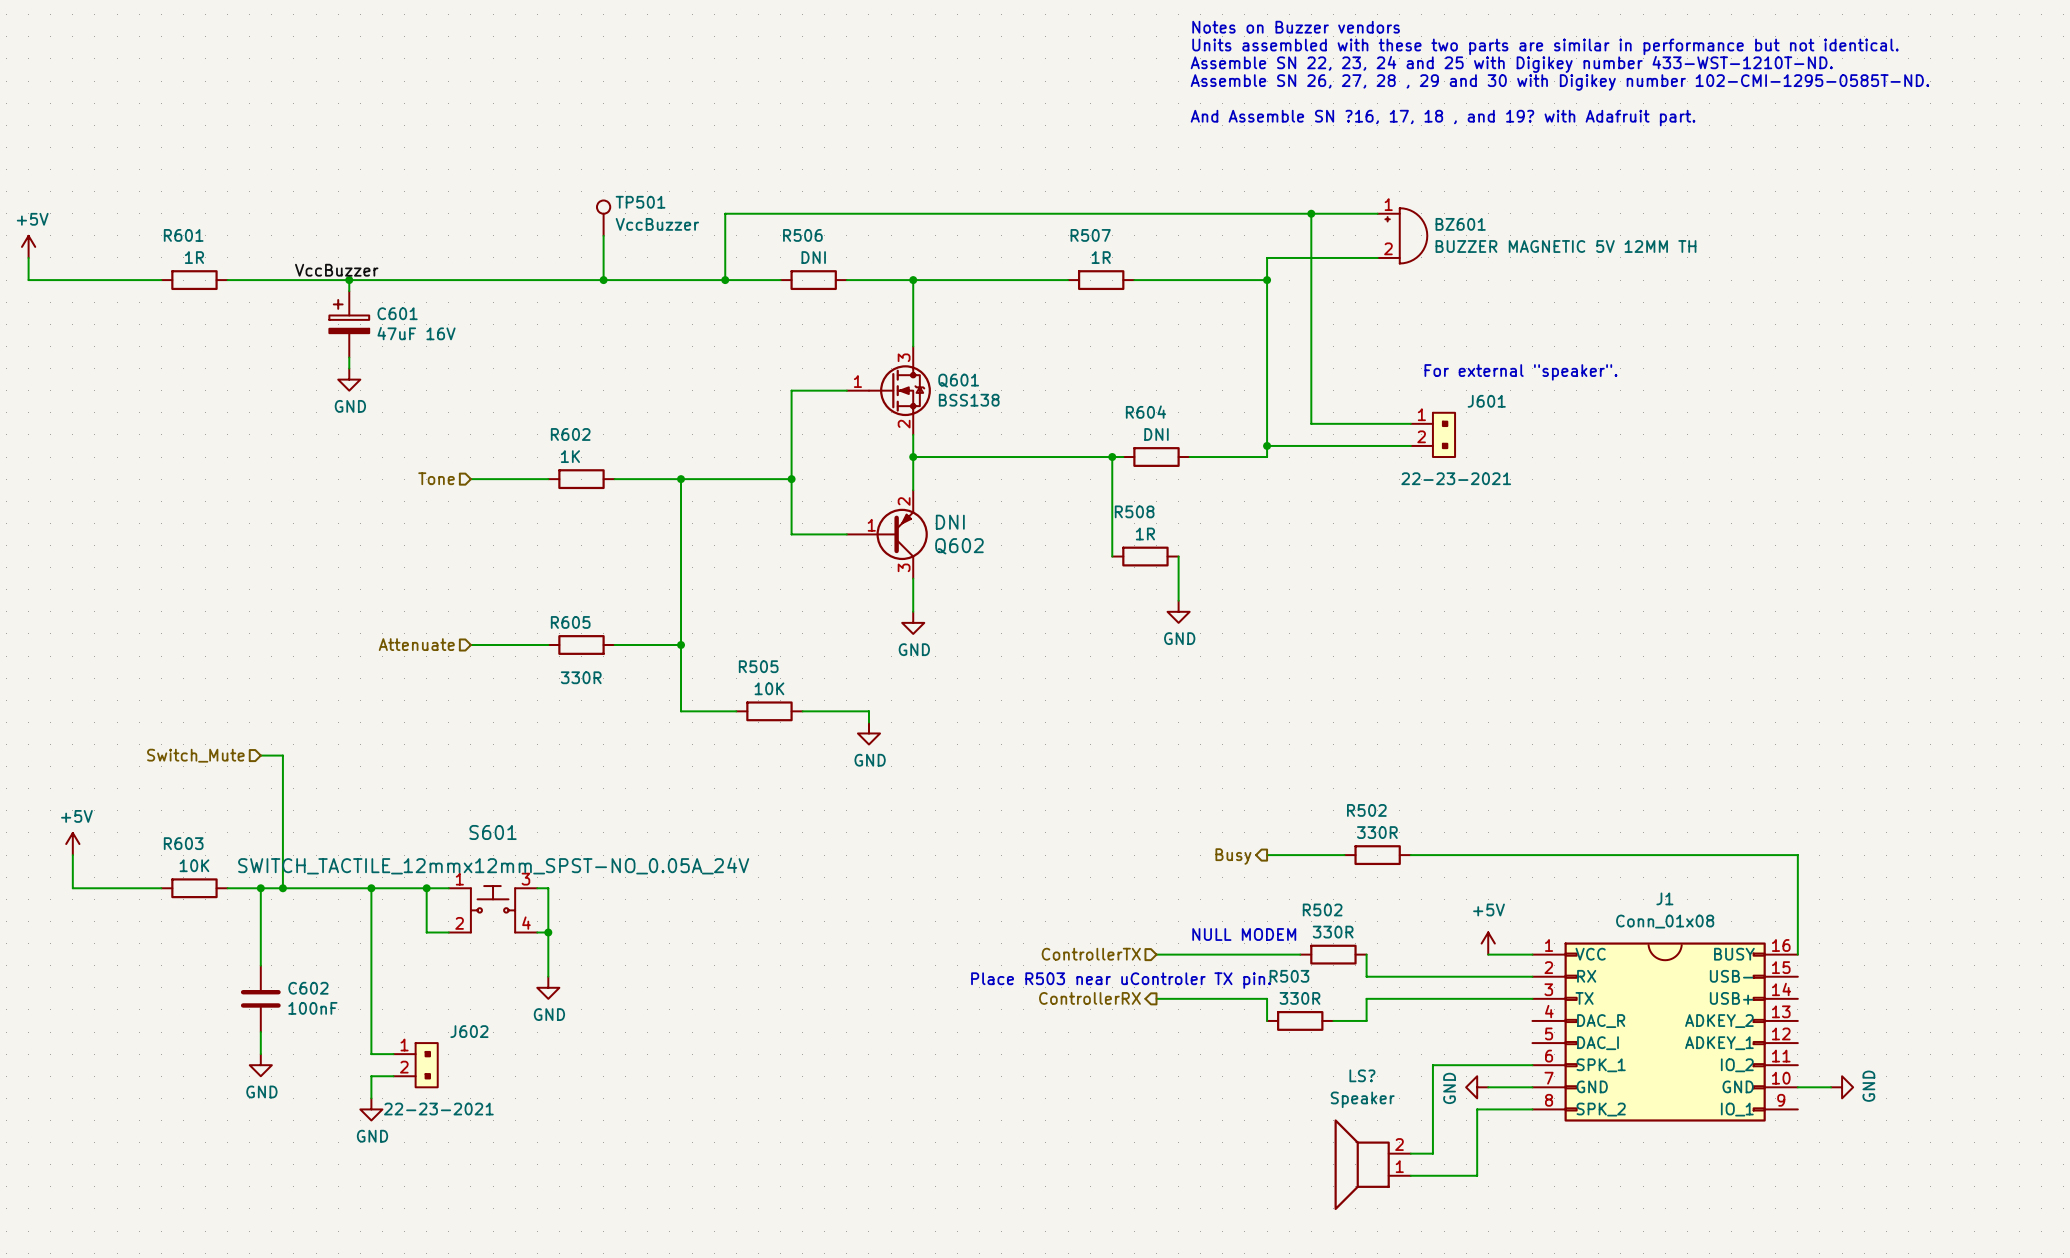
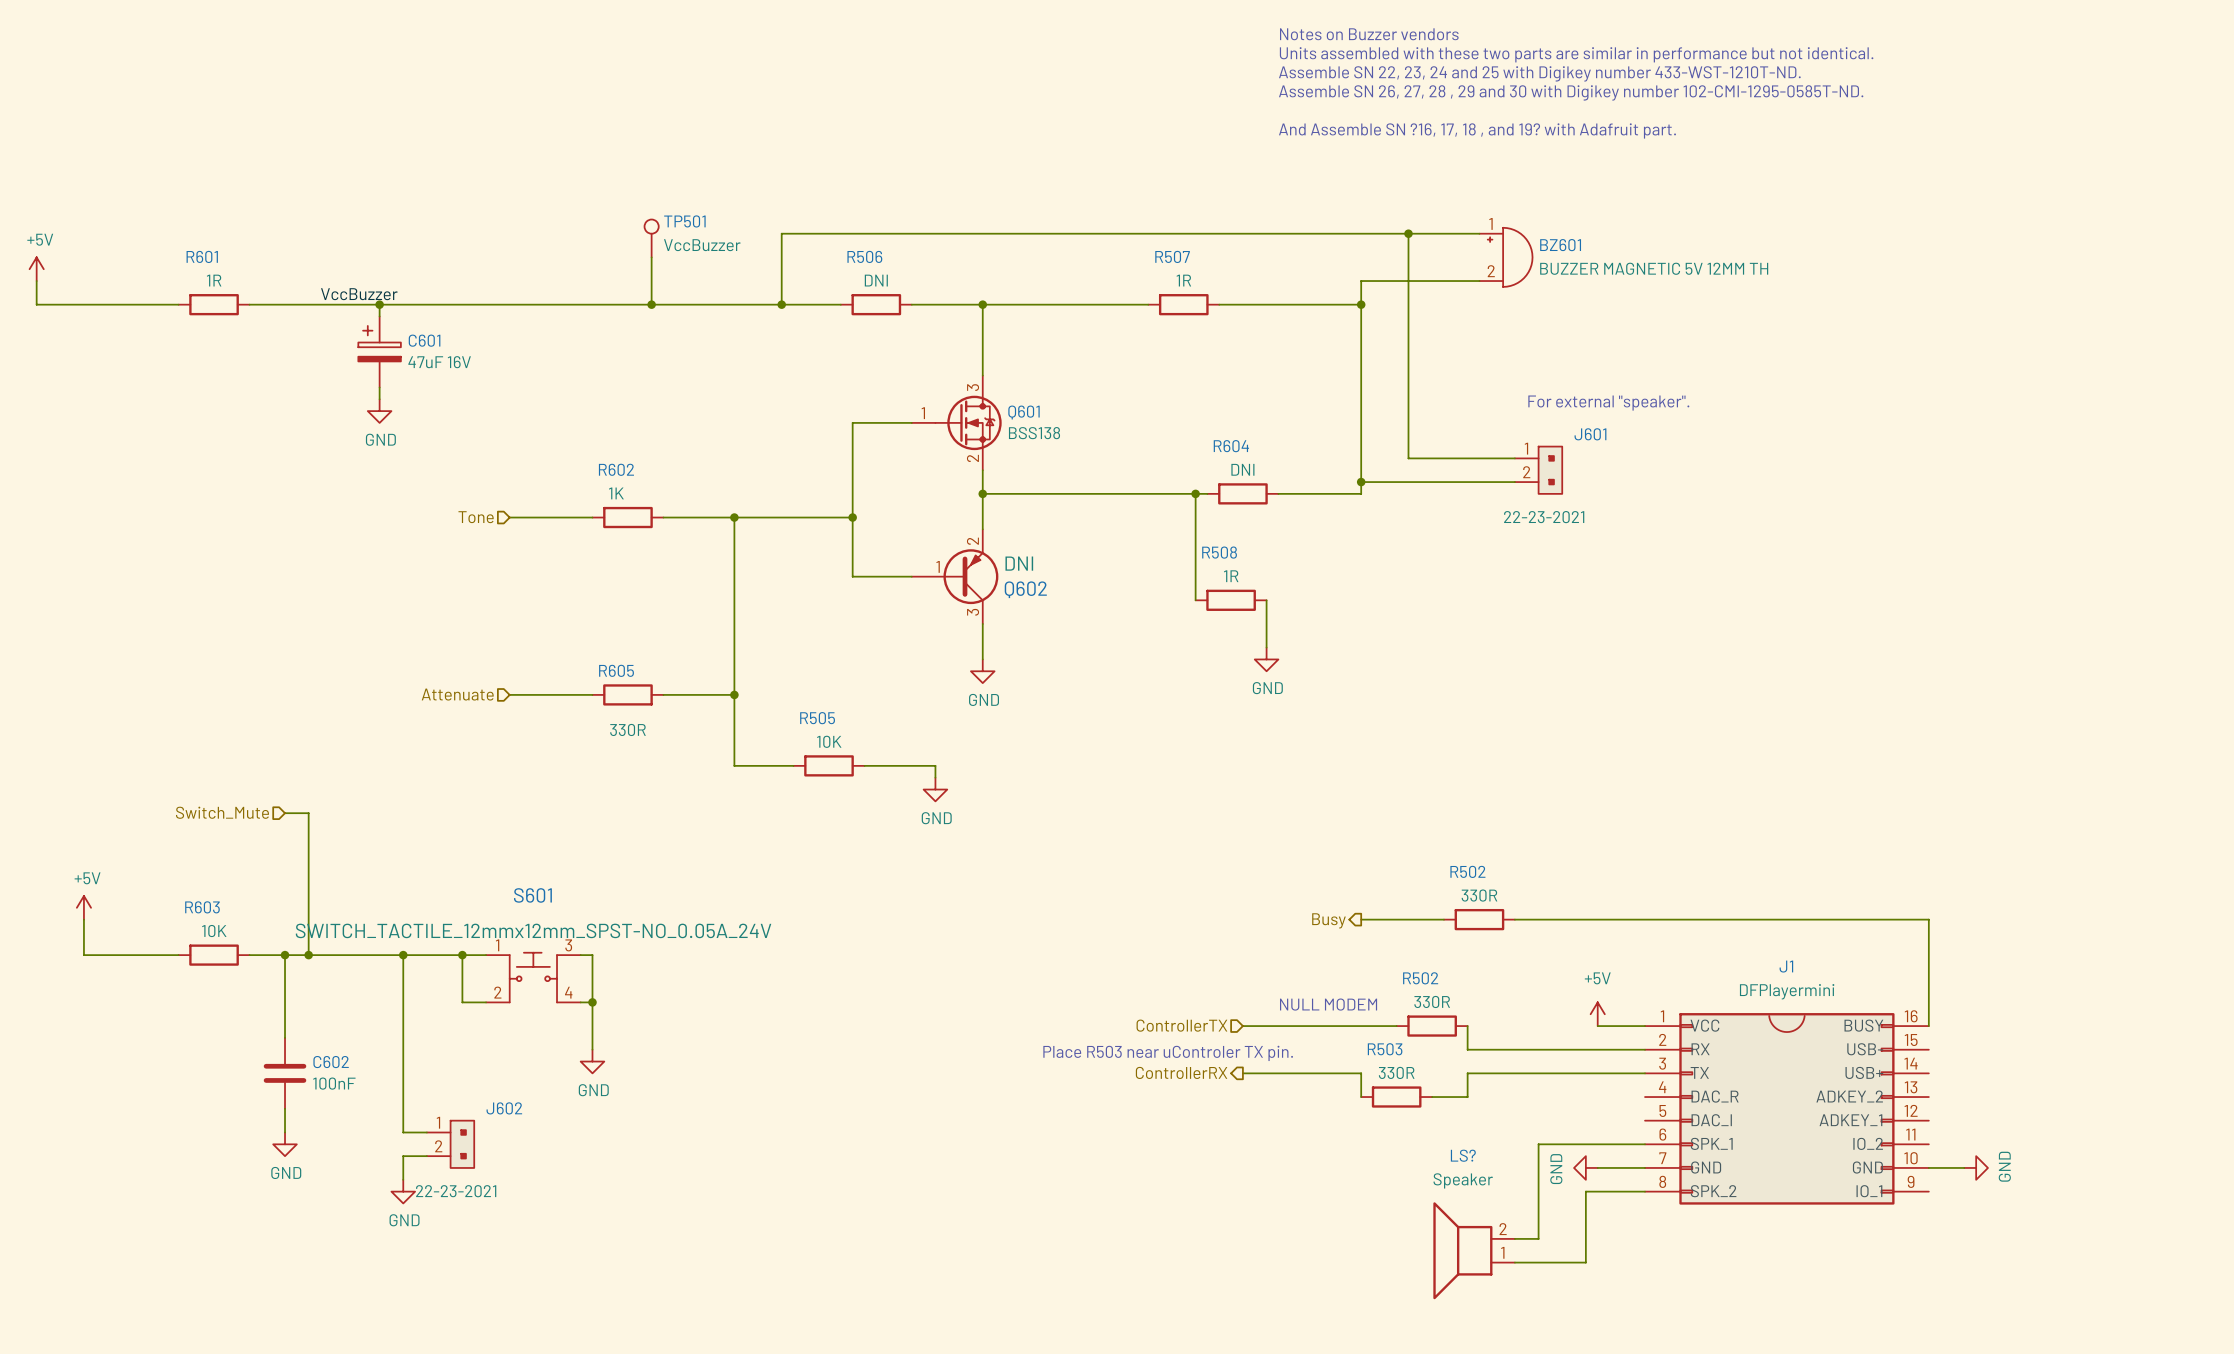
J1 value: Conn_01x08 (1665, 921) -> DFPlayermini (1787, 991)

